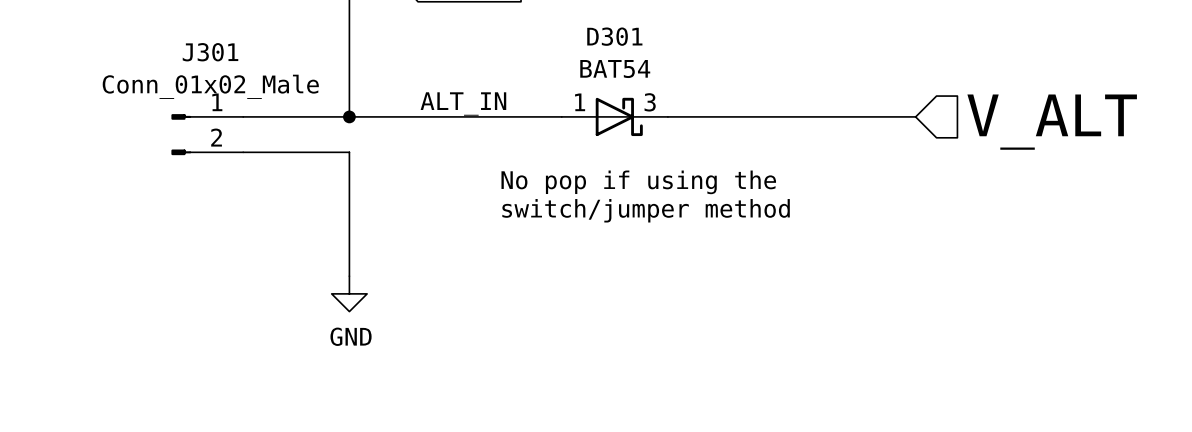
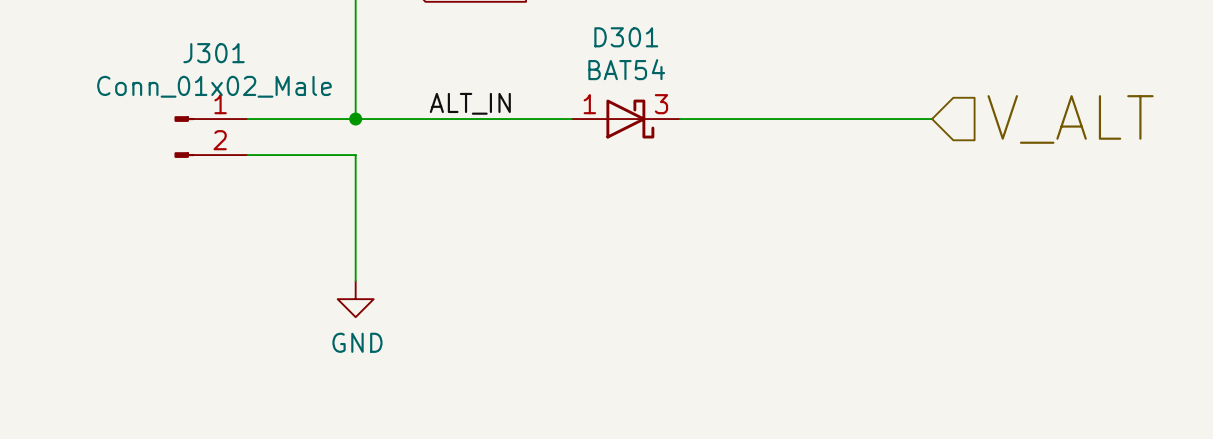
text: No pop if using the (638, 182) -> none
text: switch/jumper method (646, 210) -> none

